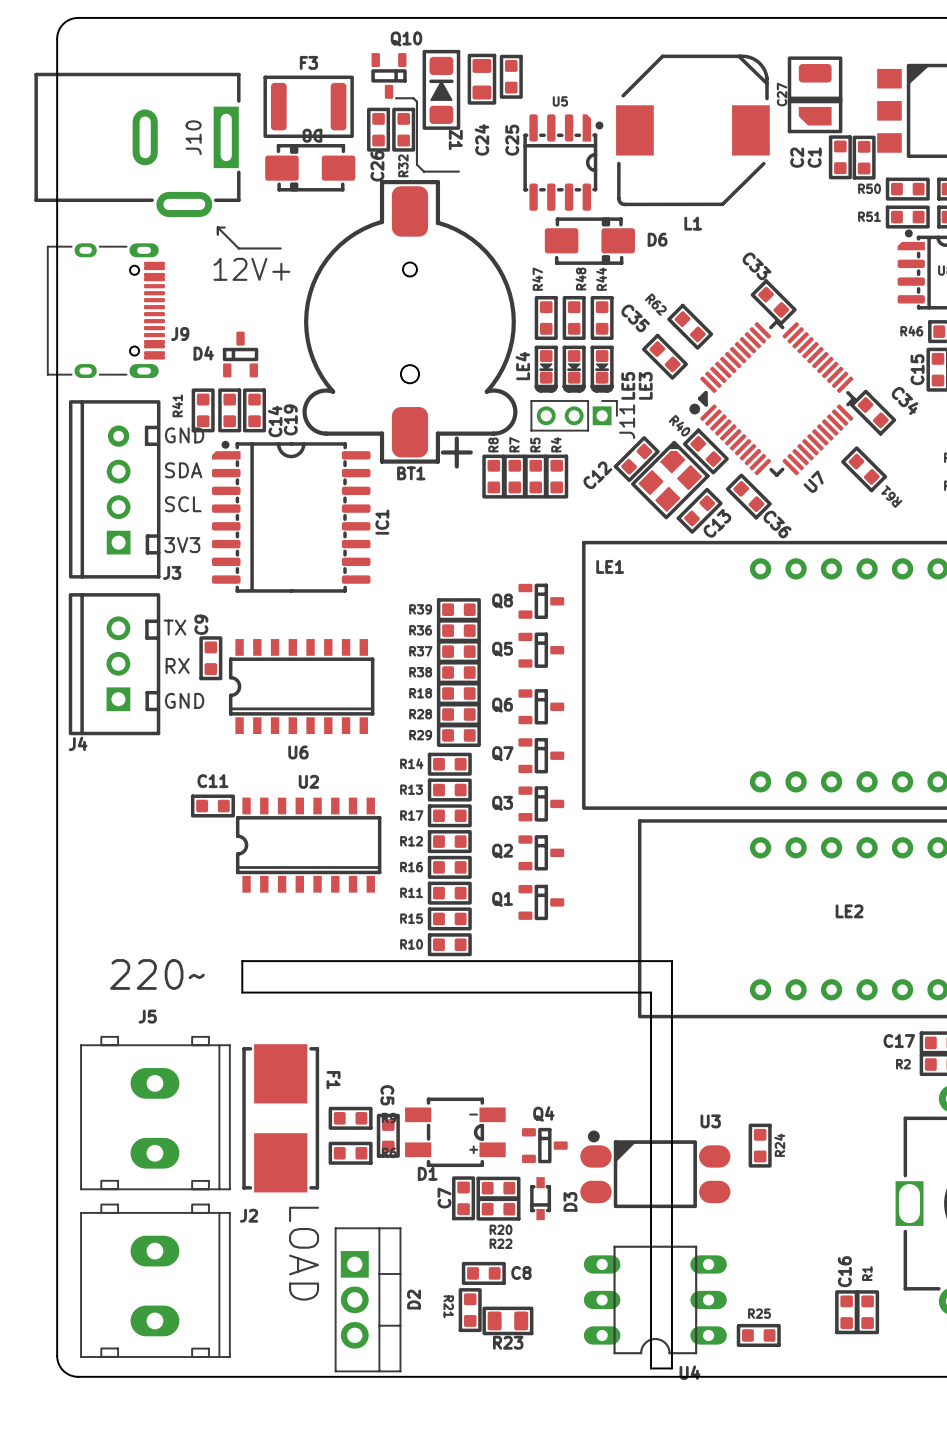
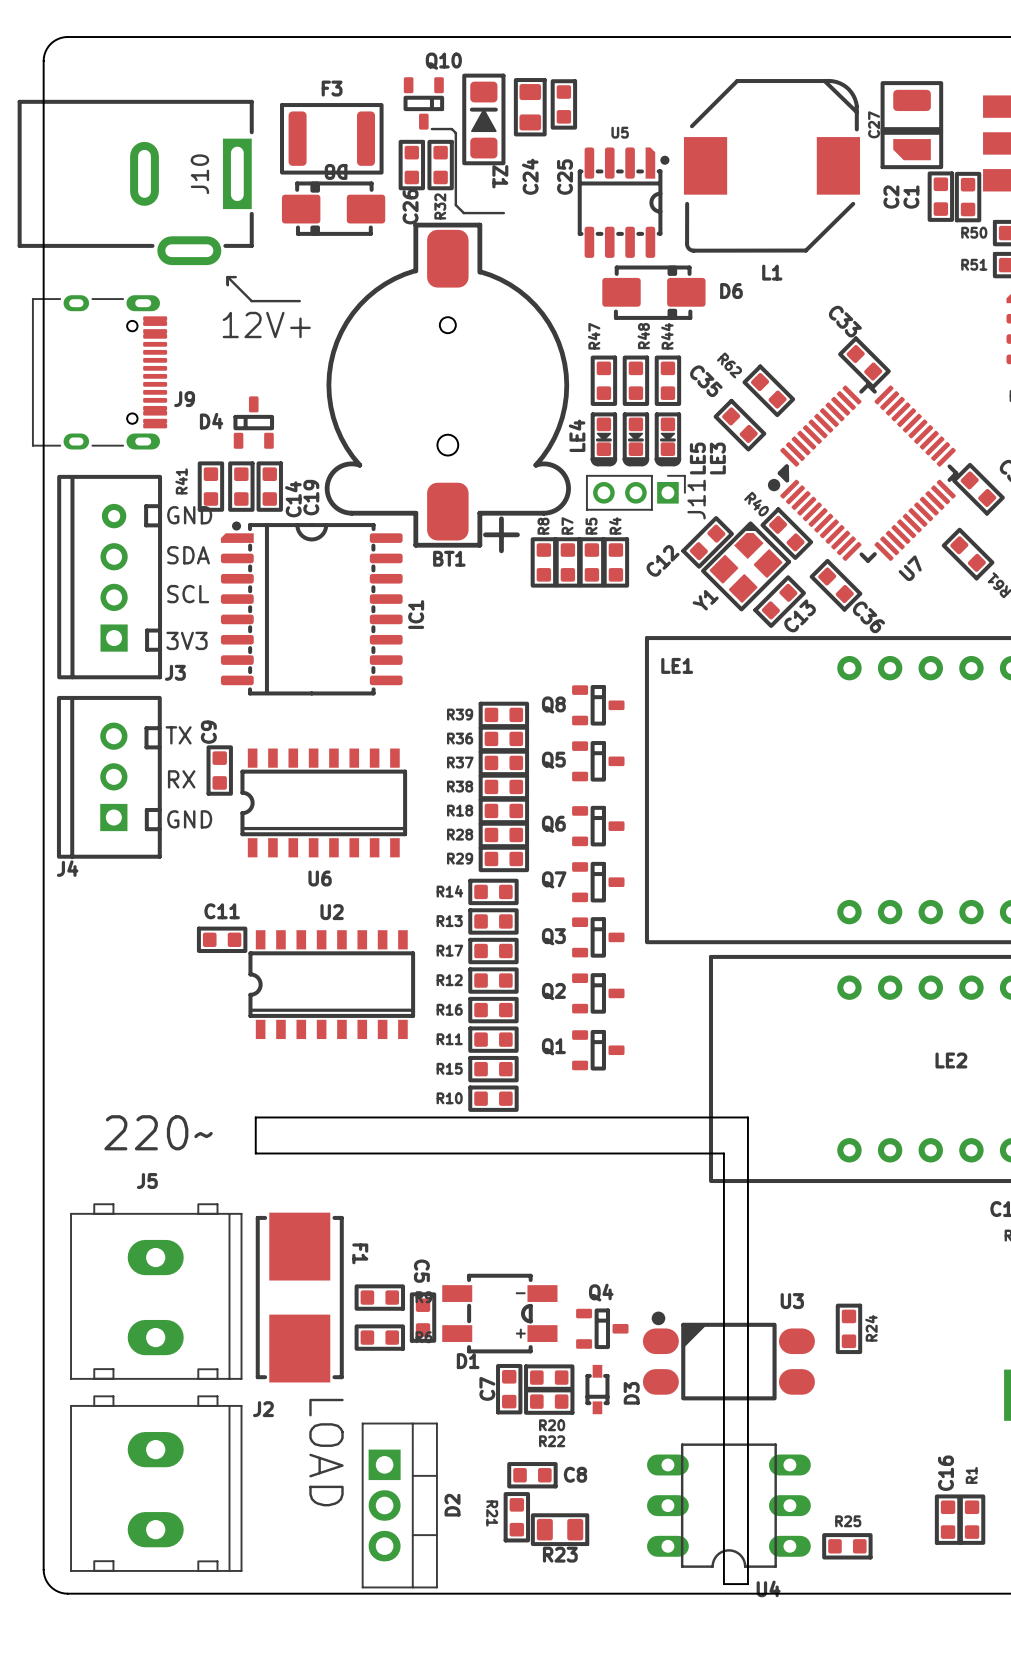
Y1 name: none -> Y1 (705, 600)

